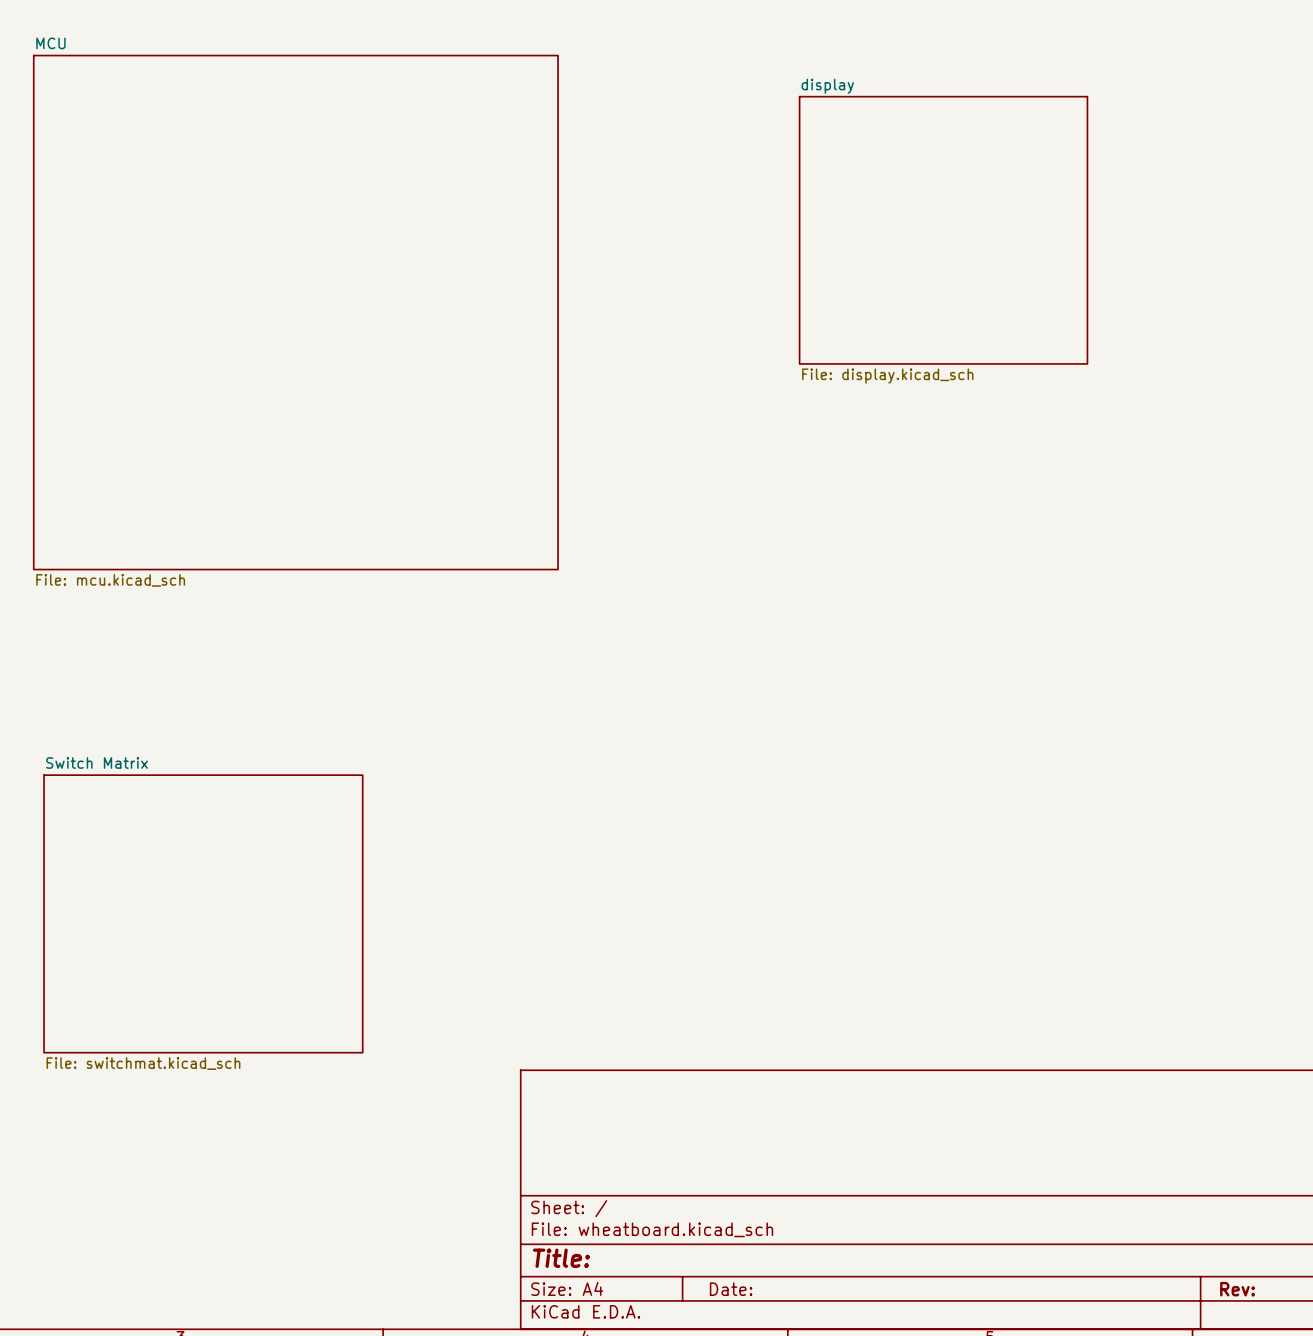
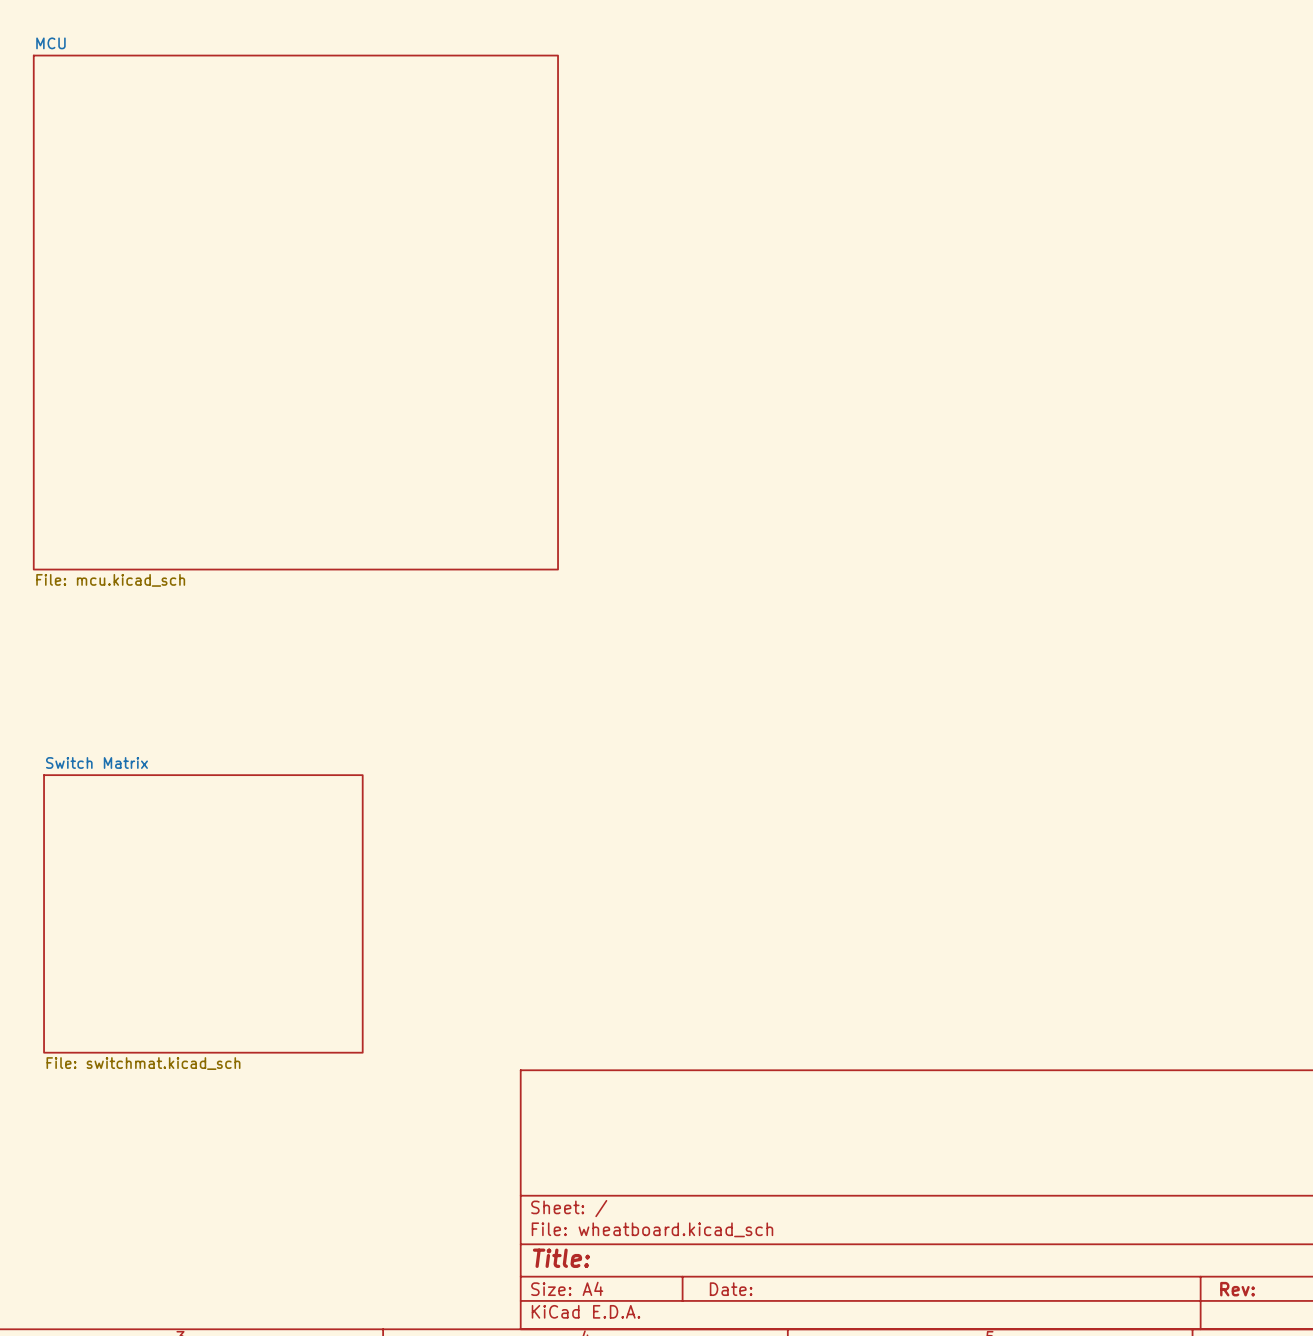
sheet display: File: display.kicad_sch (943, 230) -> none

